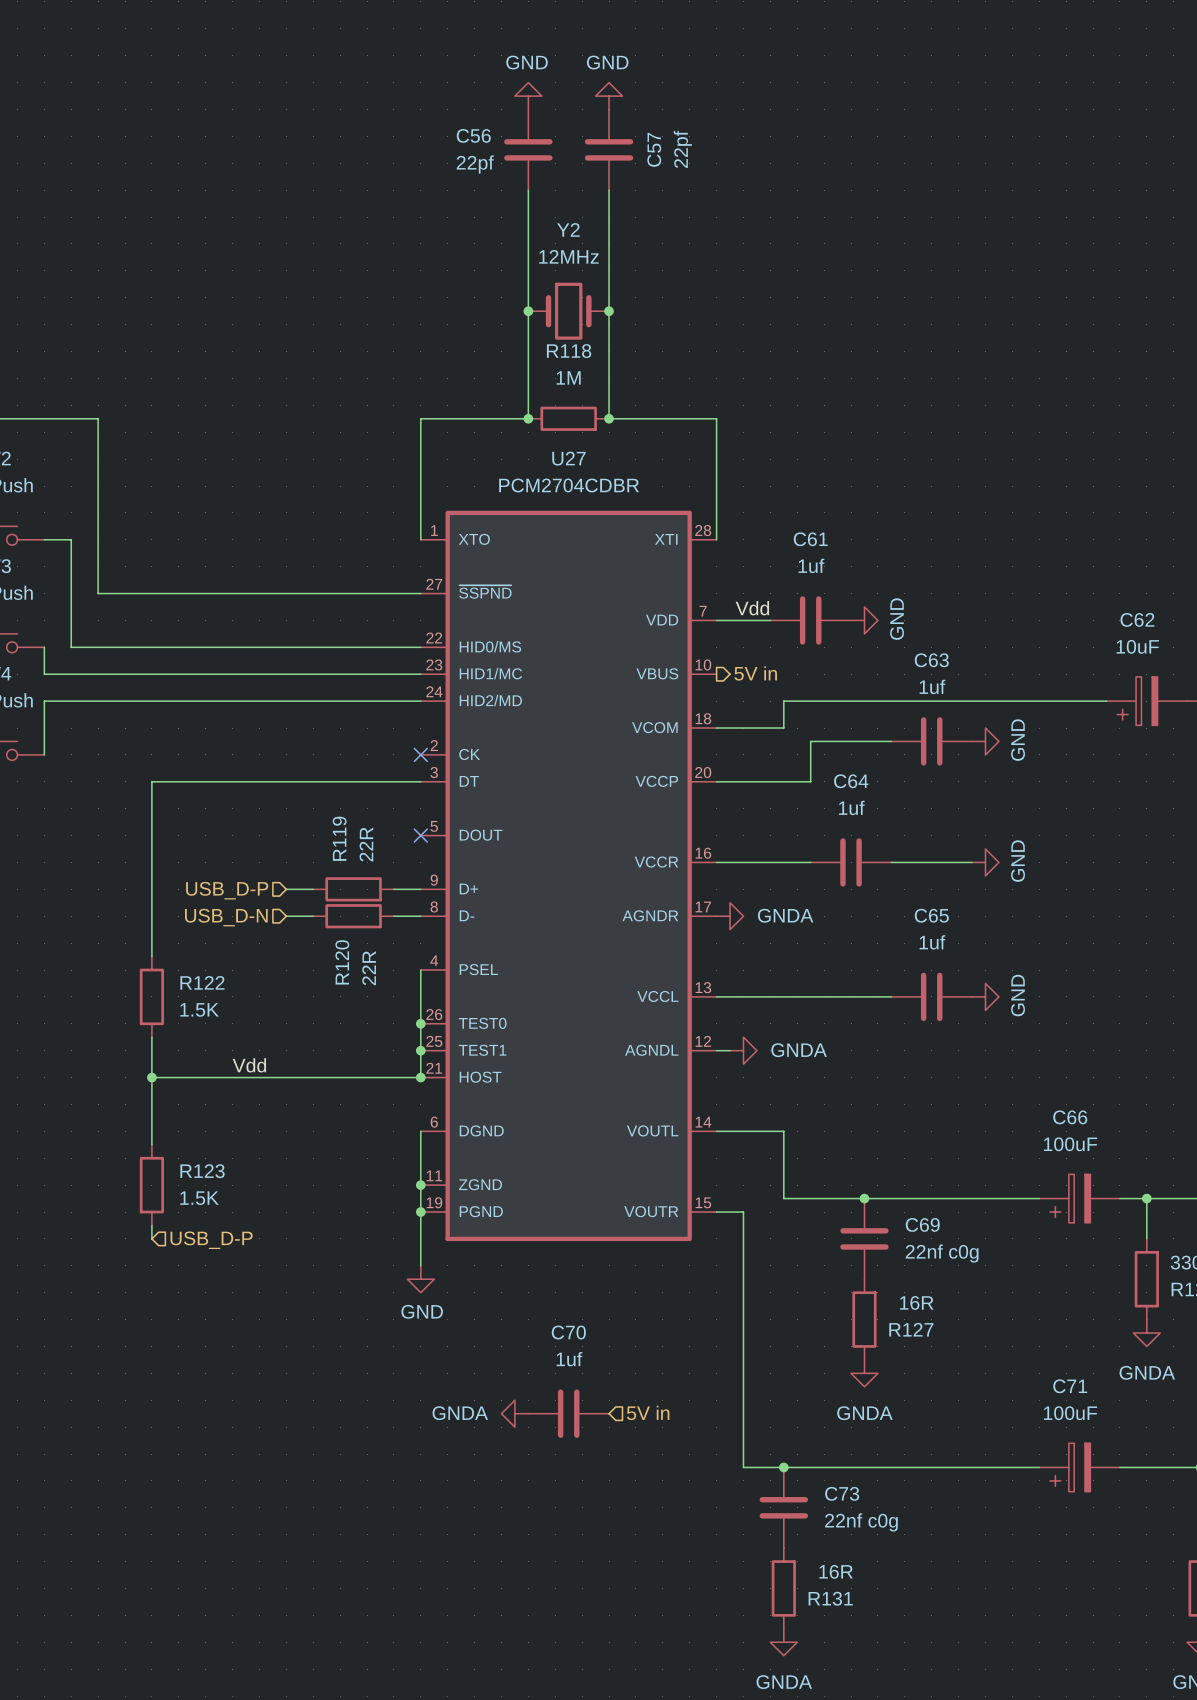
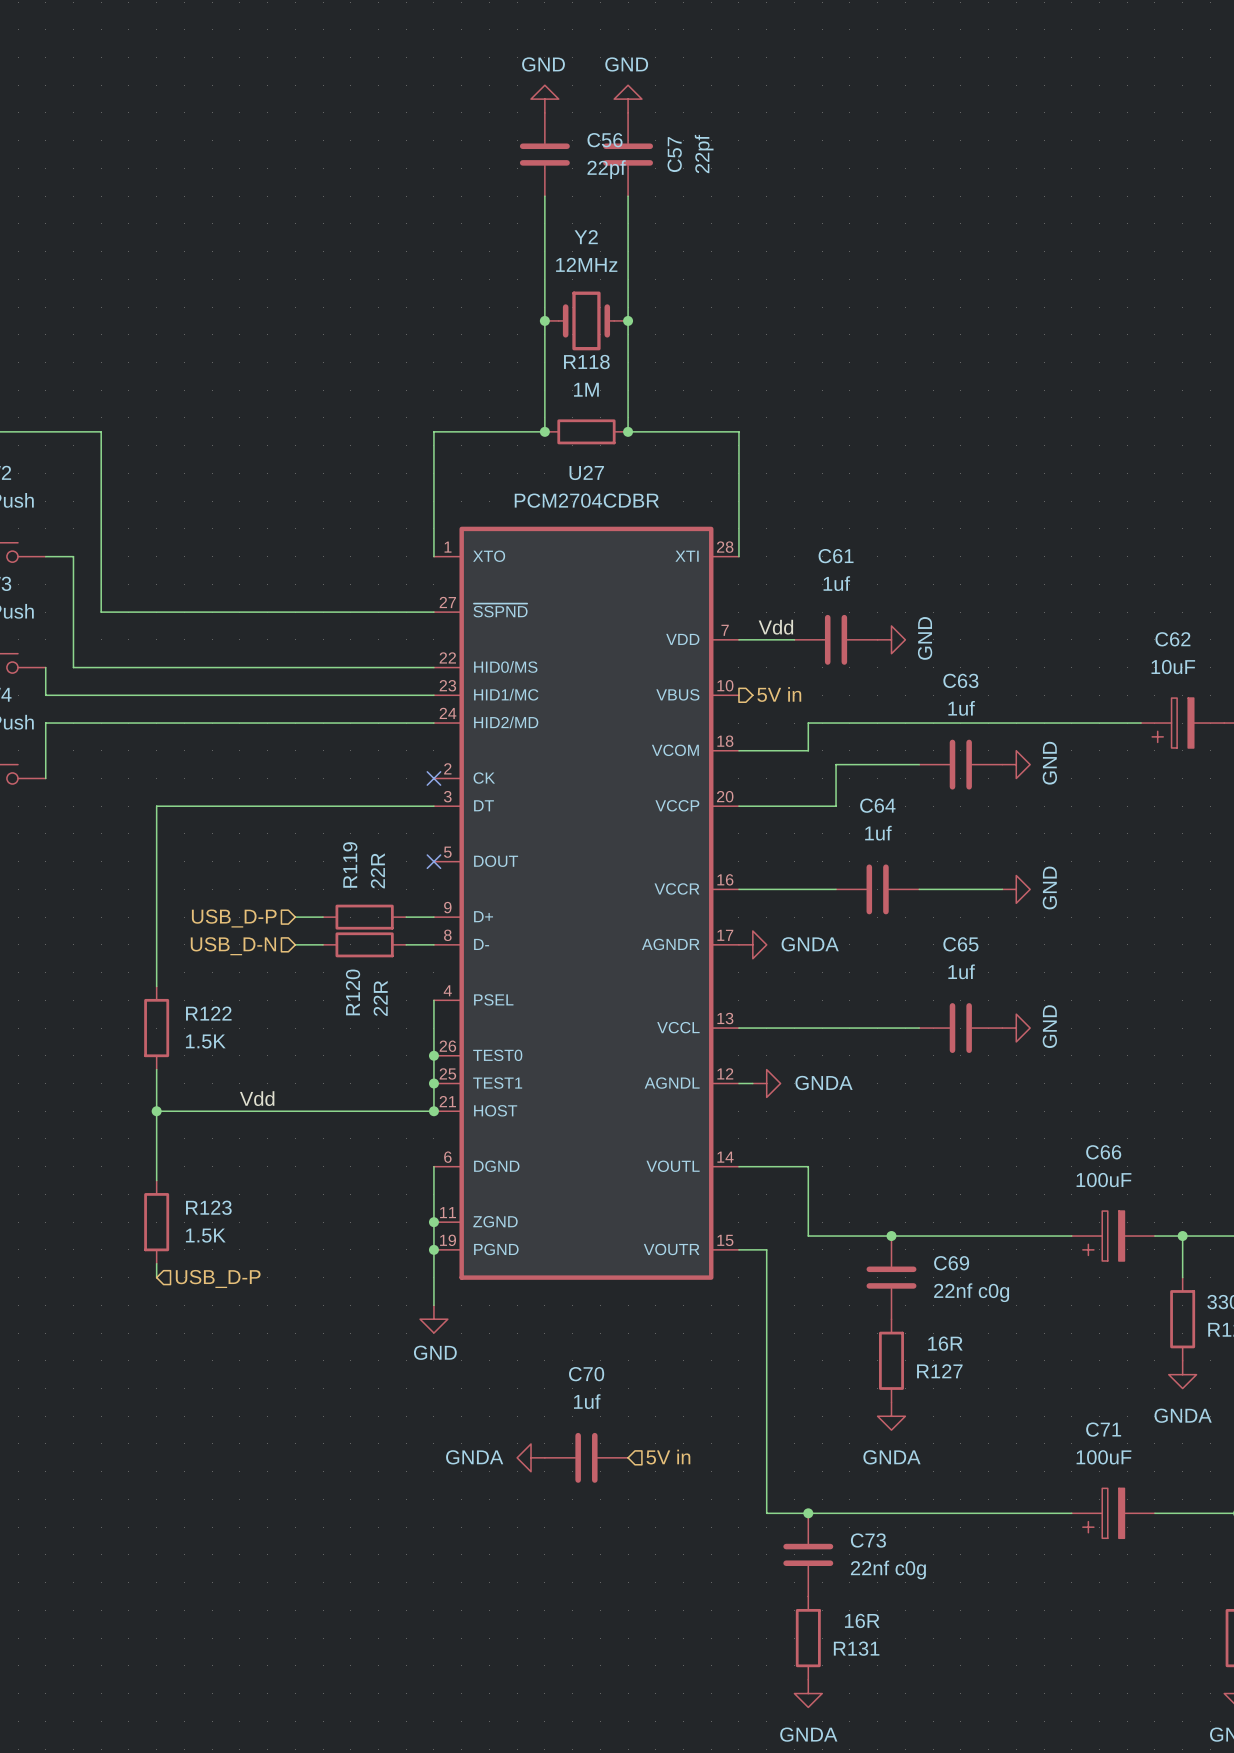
C56 name position: C56 (473, 135) -> C56 (605, 140)
C56 value position: 22pf (475, 164) -> 22pf (606, 169)

